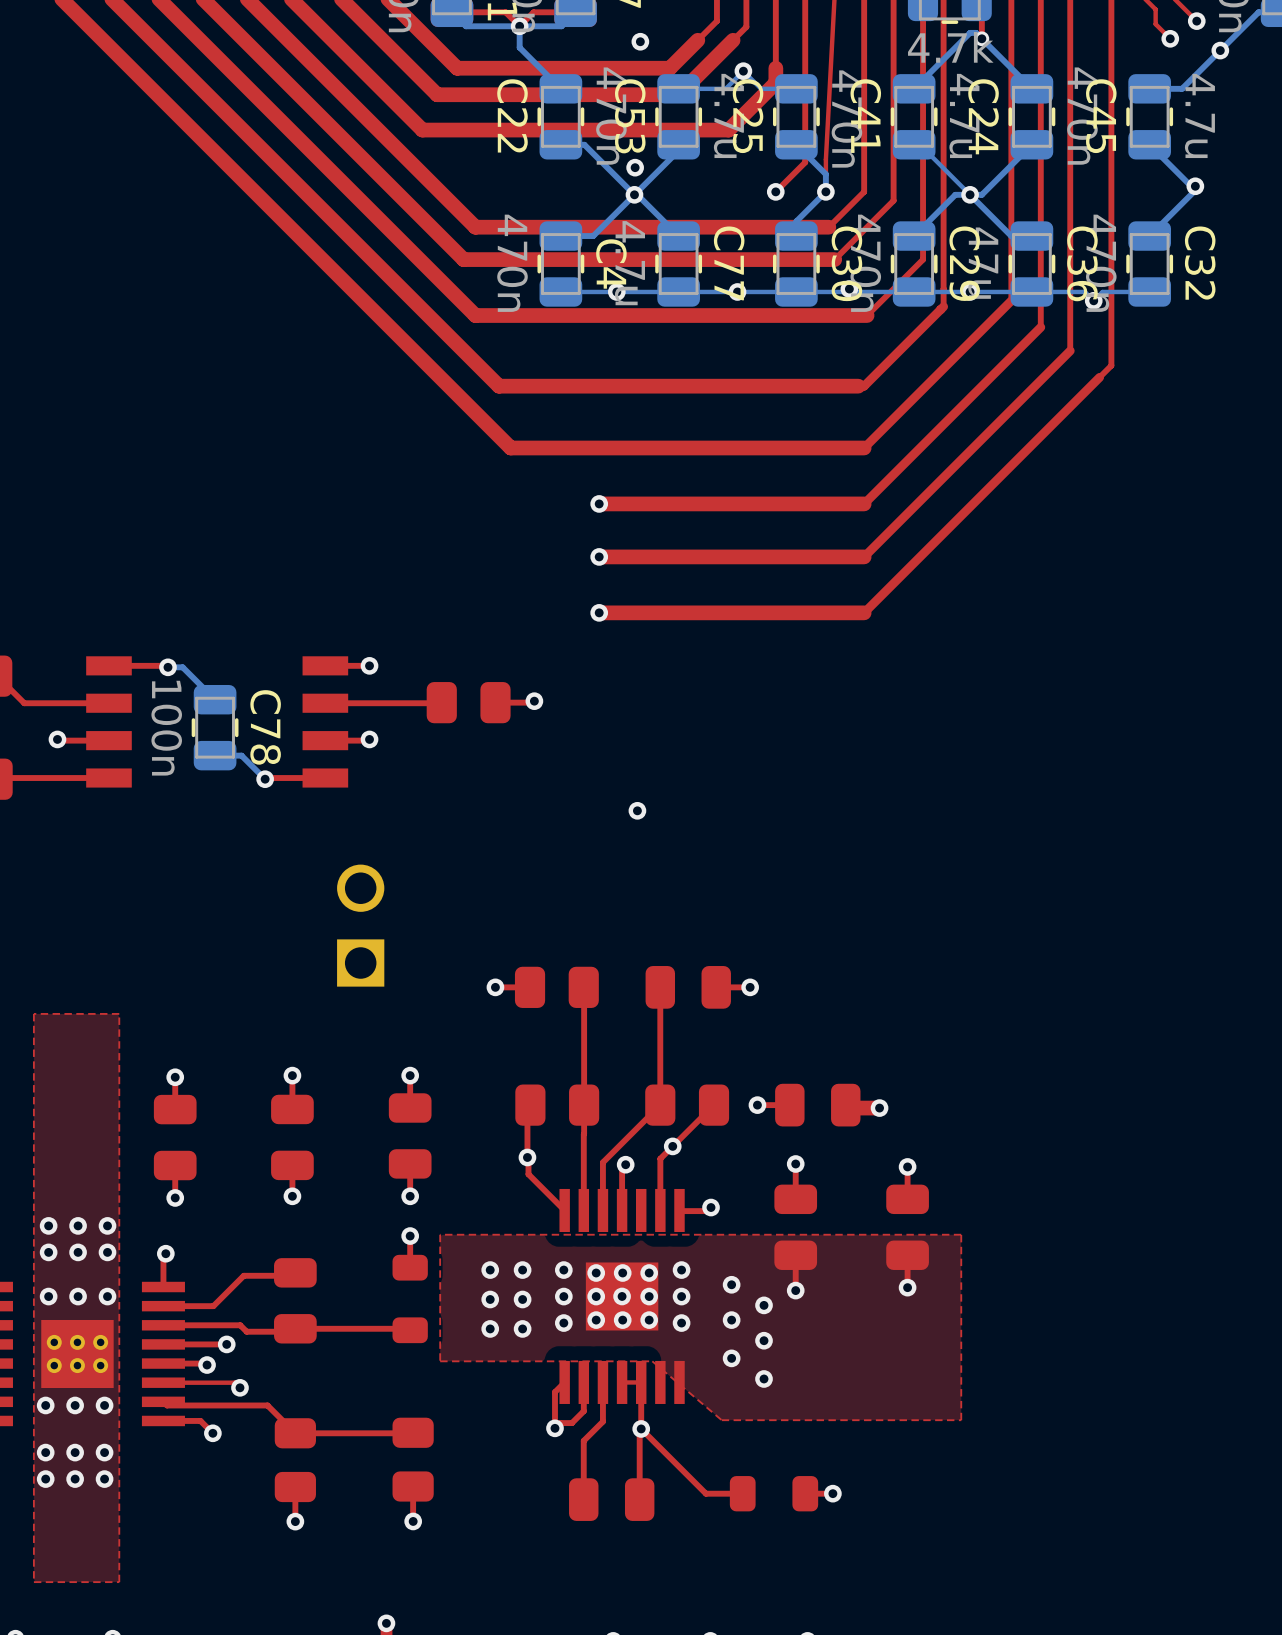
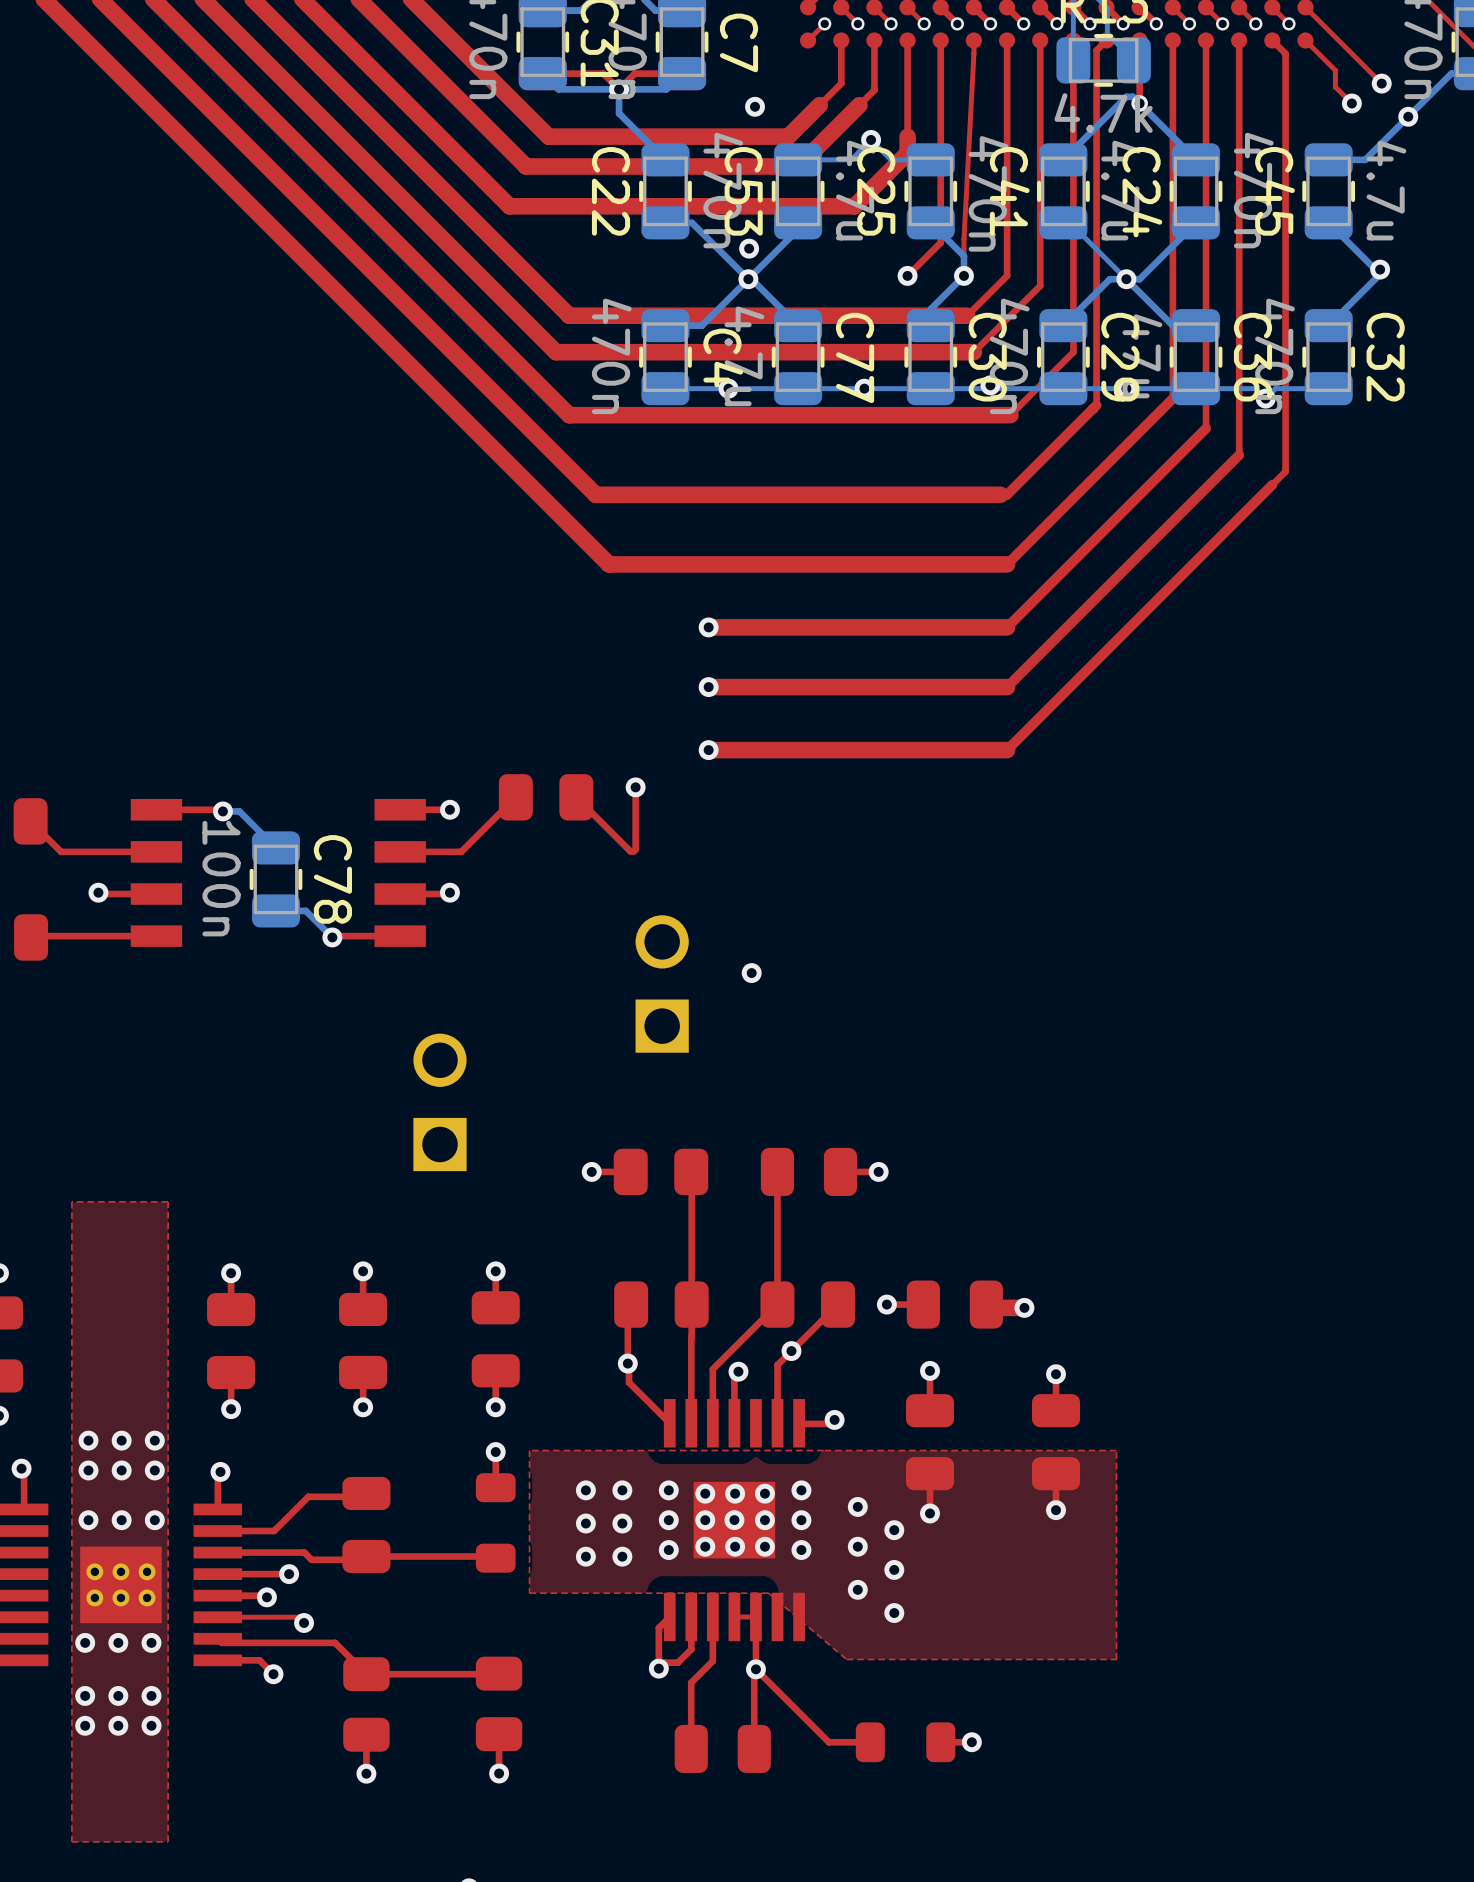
top track: none -> (635, 787) (635, 849)
via position: (534, 701) -> (635, 787)
top track: (441, 702) (379, 703) -> (515, 797) (461, 851)
part position: (468, 702) -> (546, 797)
top track: (529, 702) (495, 702) -> (630, 851) (576, 797)
part: none -> (662, 984)

